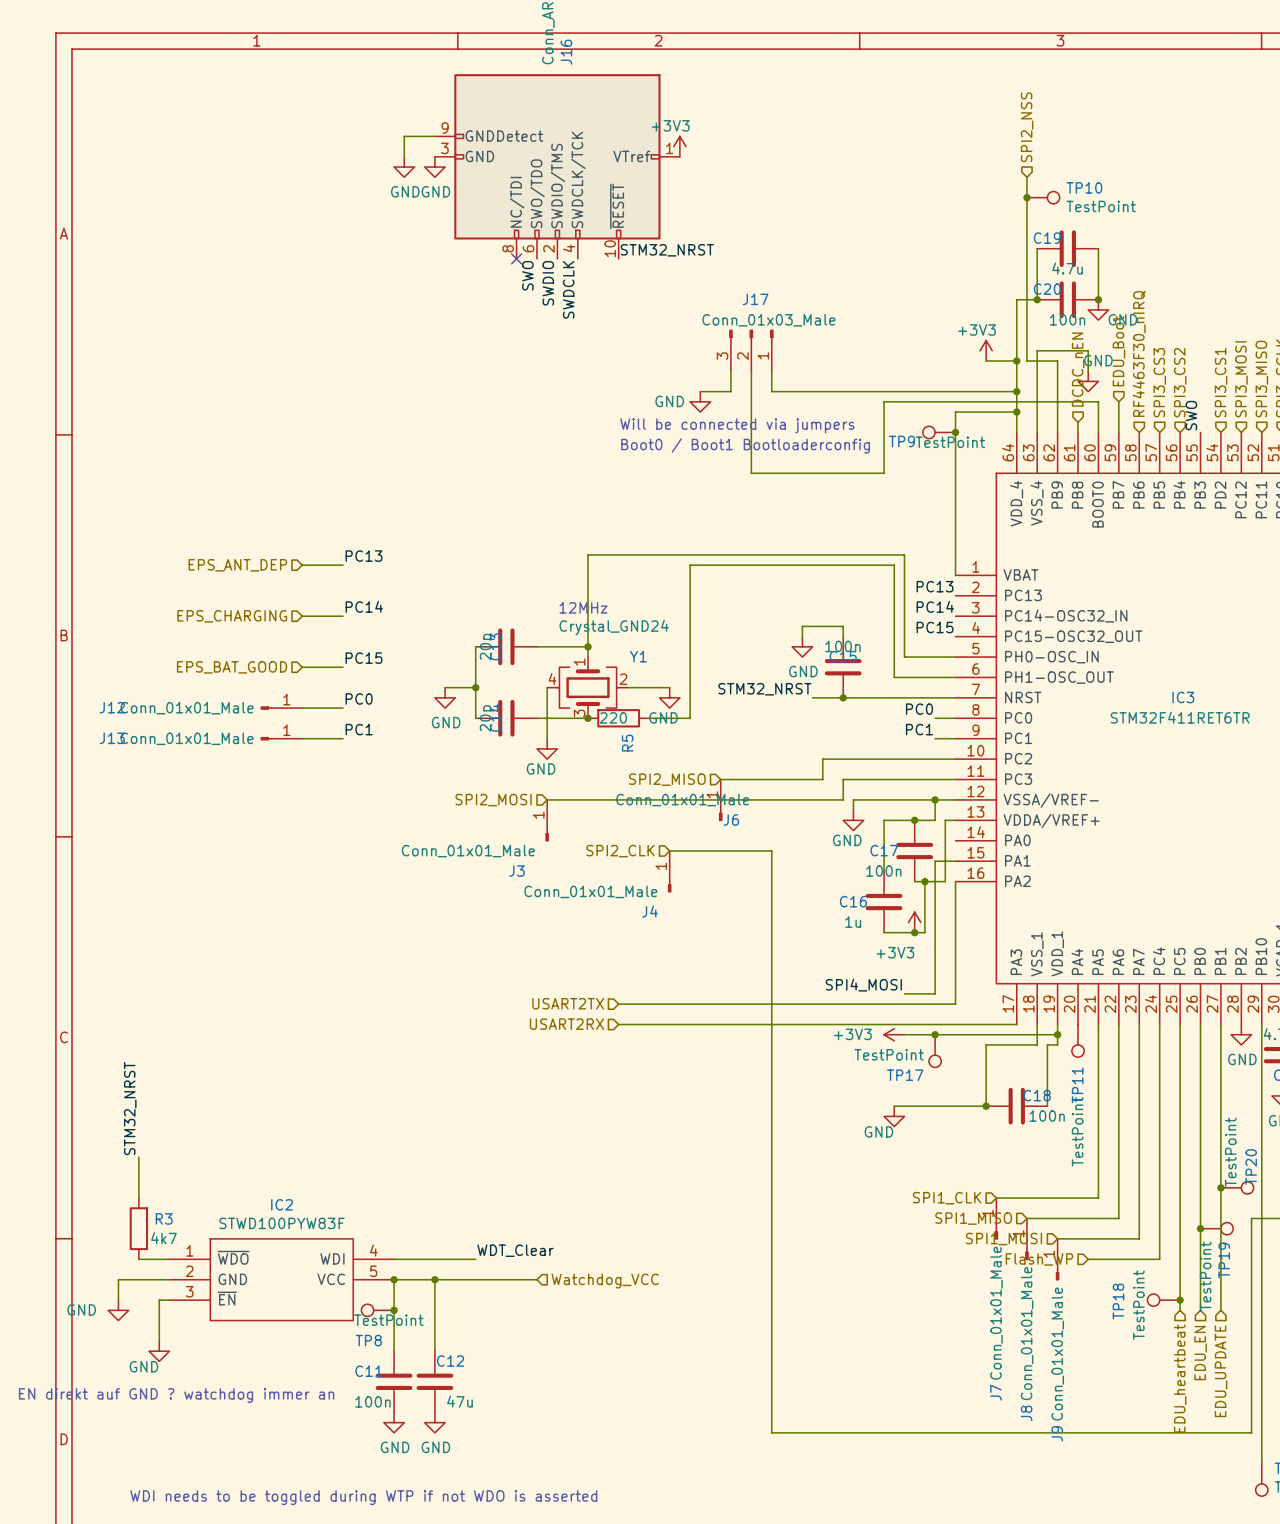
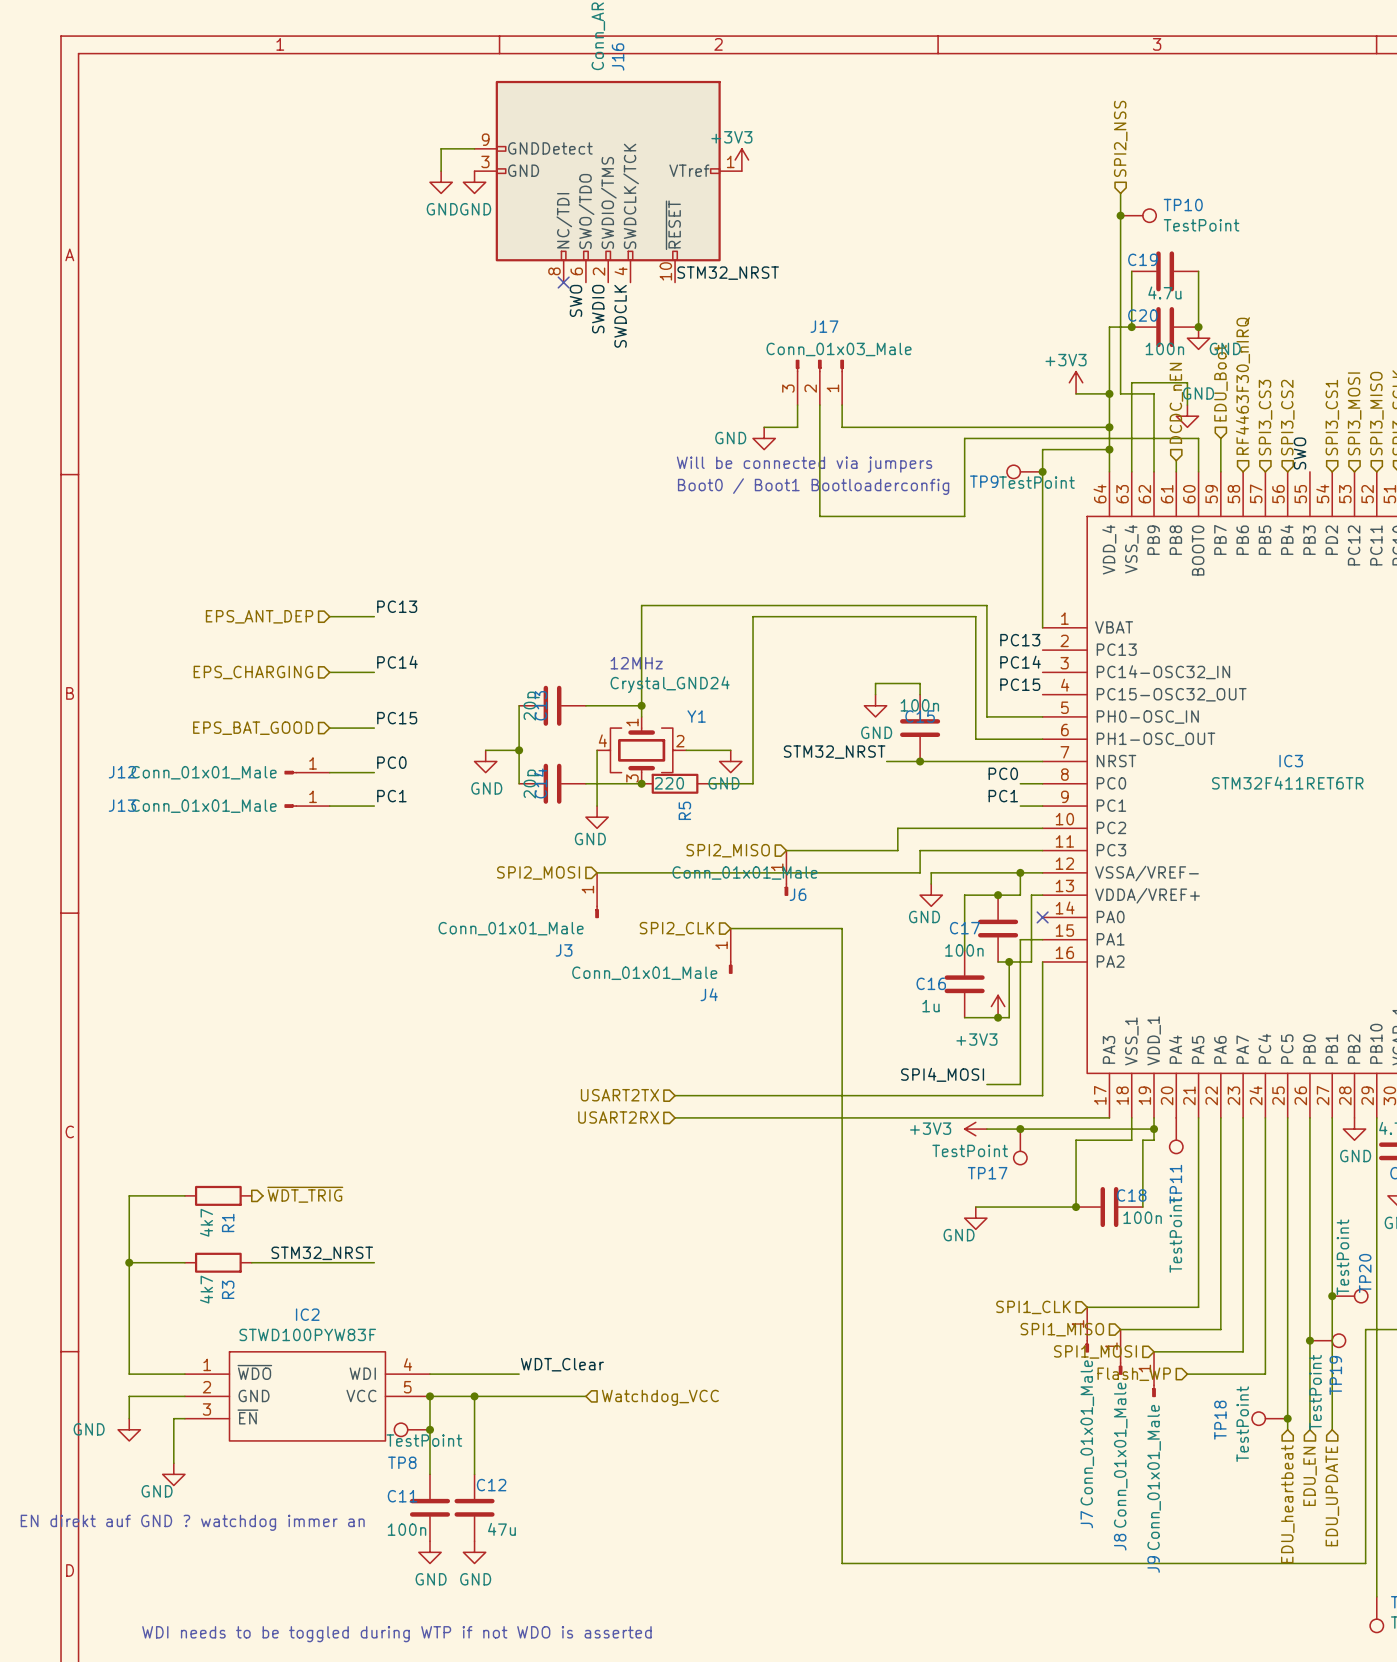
no-connect mark: none -> (1042, 917)
hierarchical label: none -> ~{WDT_TRIG} (305, 1194)
wire: none -> (184, 1195) (129, 1195) (129, 1374) (151, 1374)
R1: none -> 4k7 (218, 1195)
label: STM32_NRST (130, 1108) -> none
label: none -> STM32_NRST (322, 1253)
wire: none -> (129, 1262) (184, 1262)
junction: none -> (129, 1262)
wire: (138, 1157) (138, 1198) -> none
wire: none -> (251, 1262) (374, 1262)
R3 rotation: 0° (138, 1228) -> 90° clockwise (218, 1262)
R3 position: (138, 1228) -> (218, 1262)

